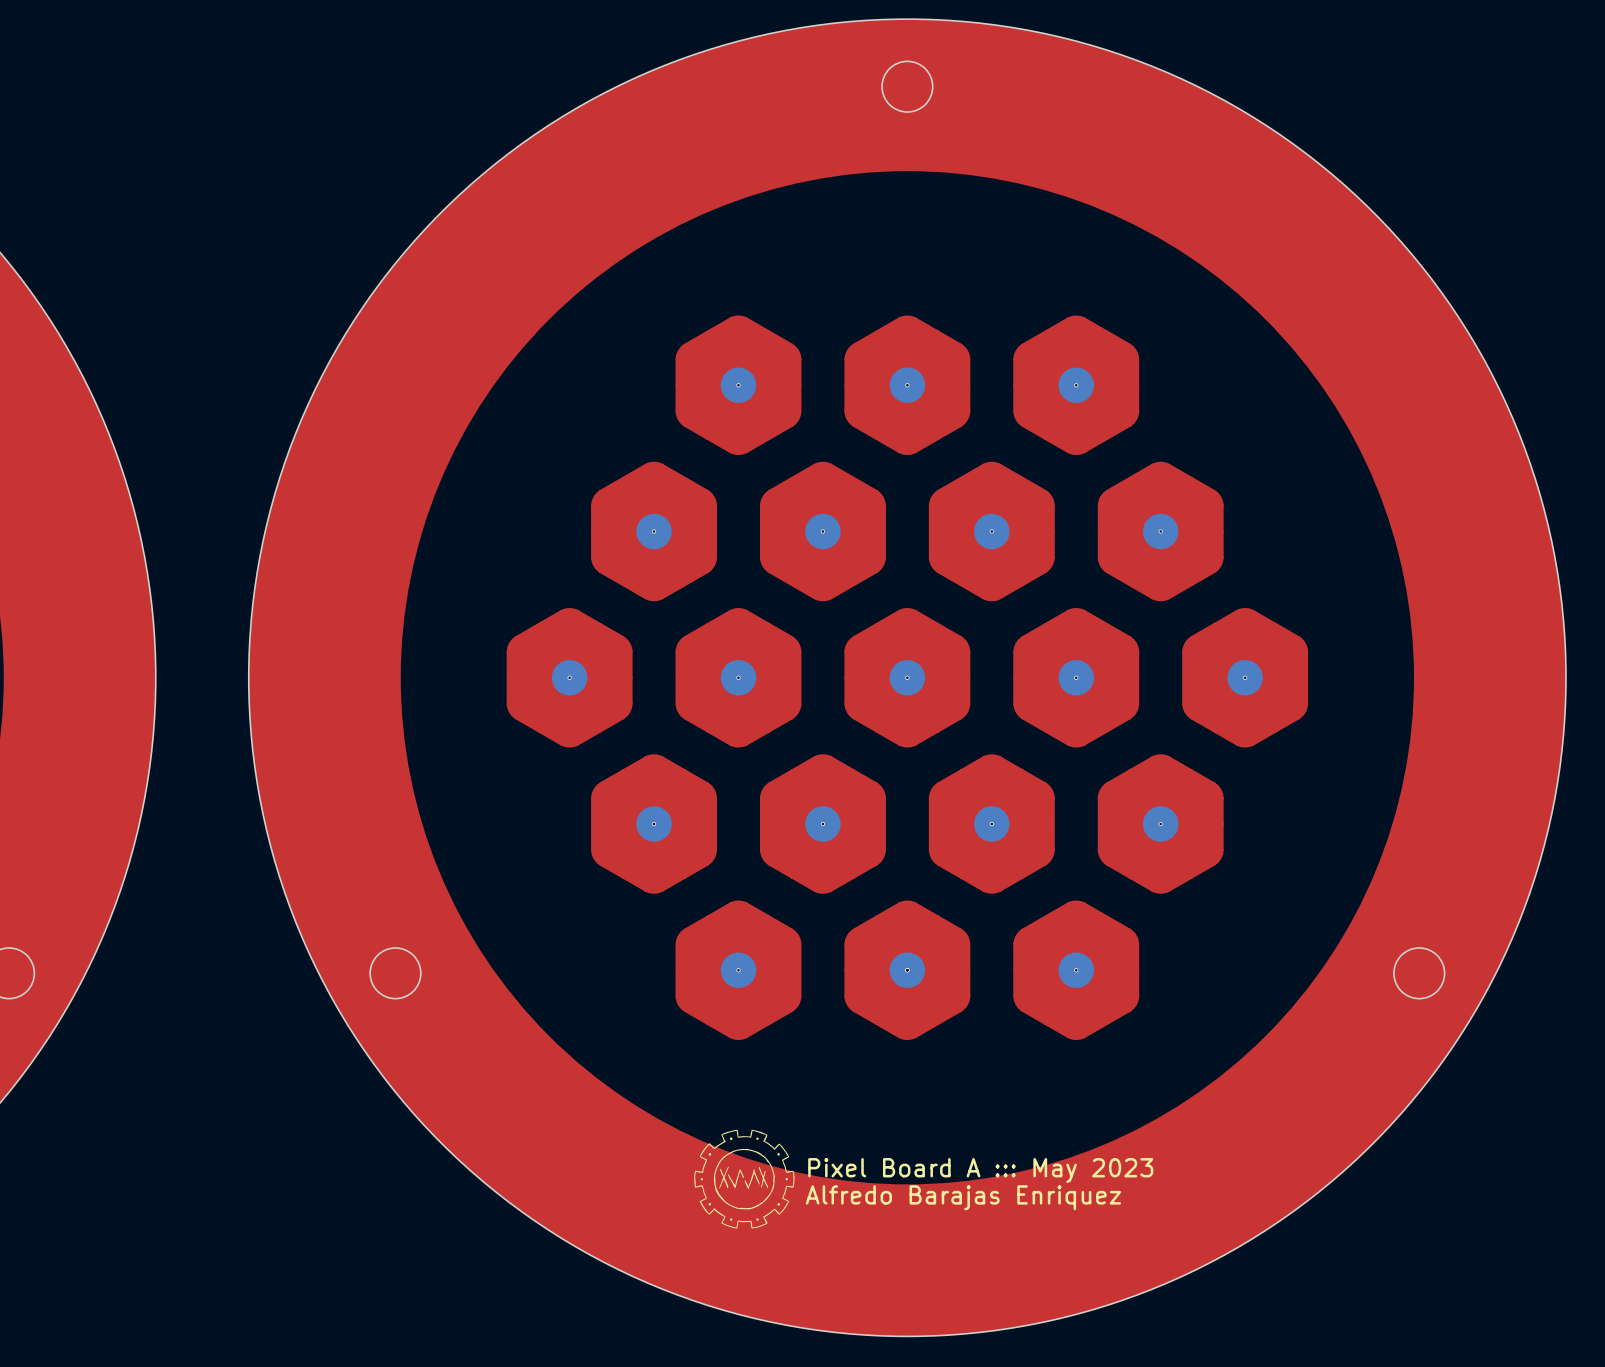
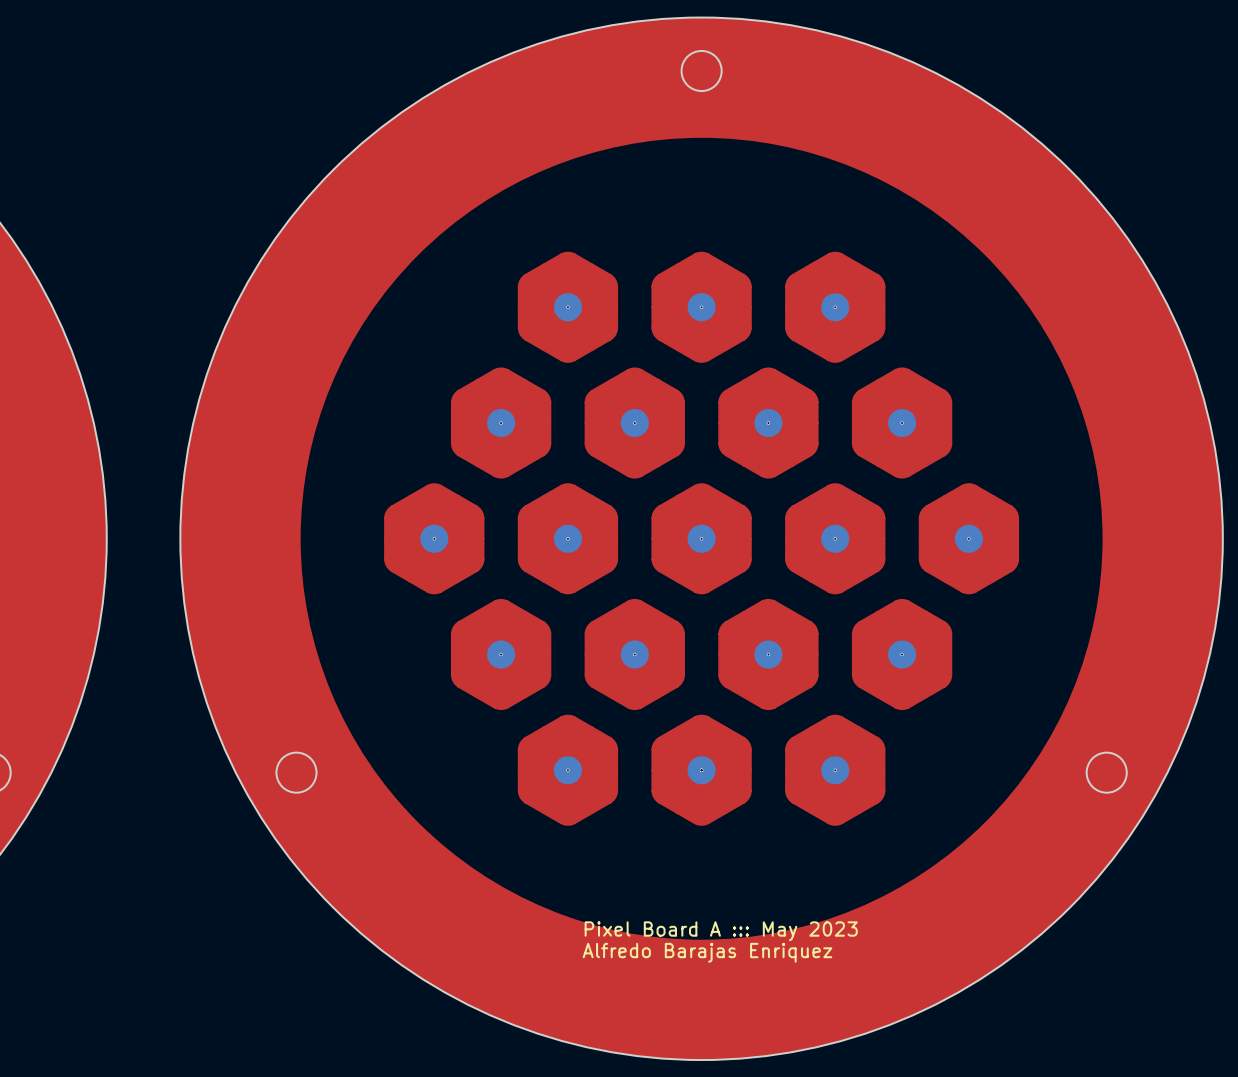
drawing: [694, 1129, 795, 1229] -> none
text position: Pixel Board A ::: May 2023 (980, 1170) -> Pixel Board A ::: May 2023 (721, 931)
text position: Alfredo Barajas Enriquez (963, 1197) -> Alfredo Barajas Enriquez (707, 952)

